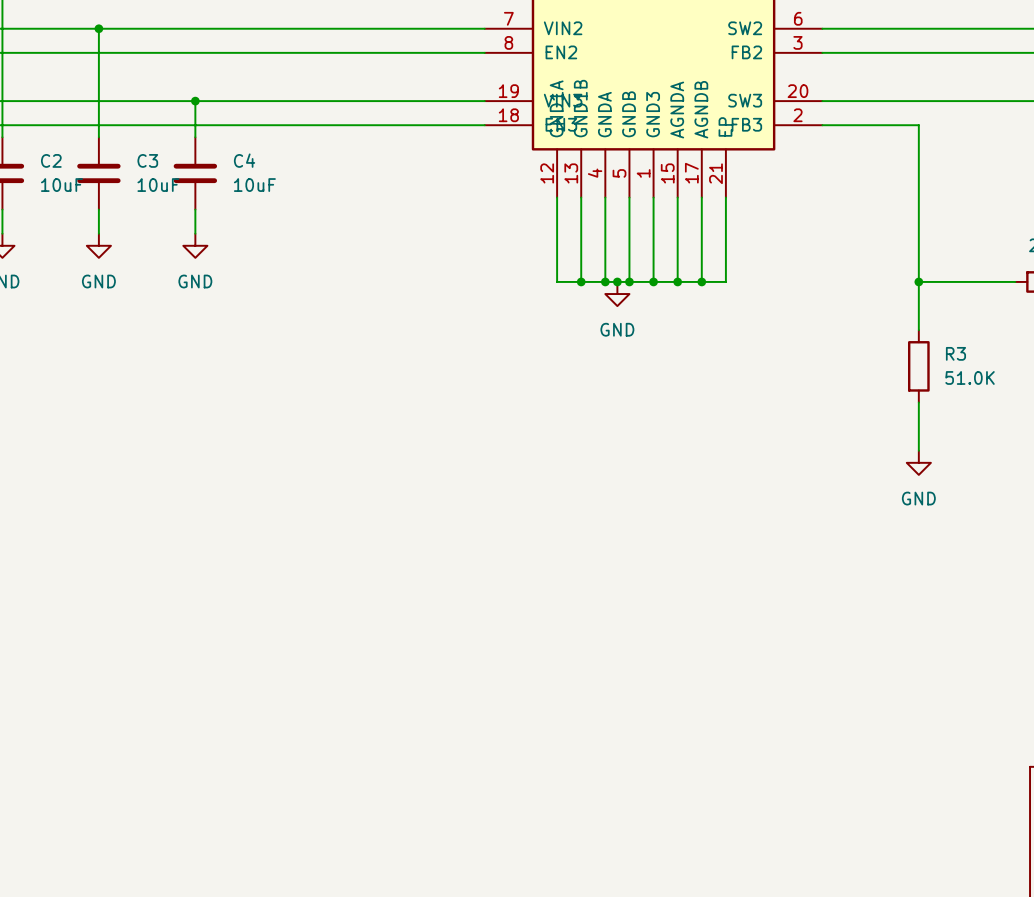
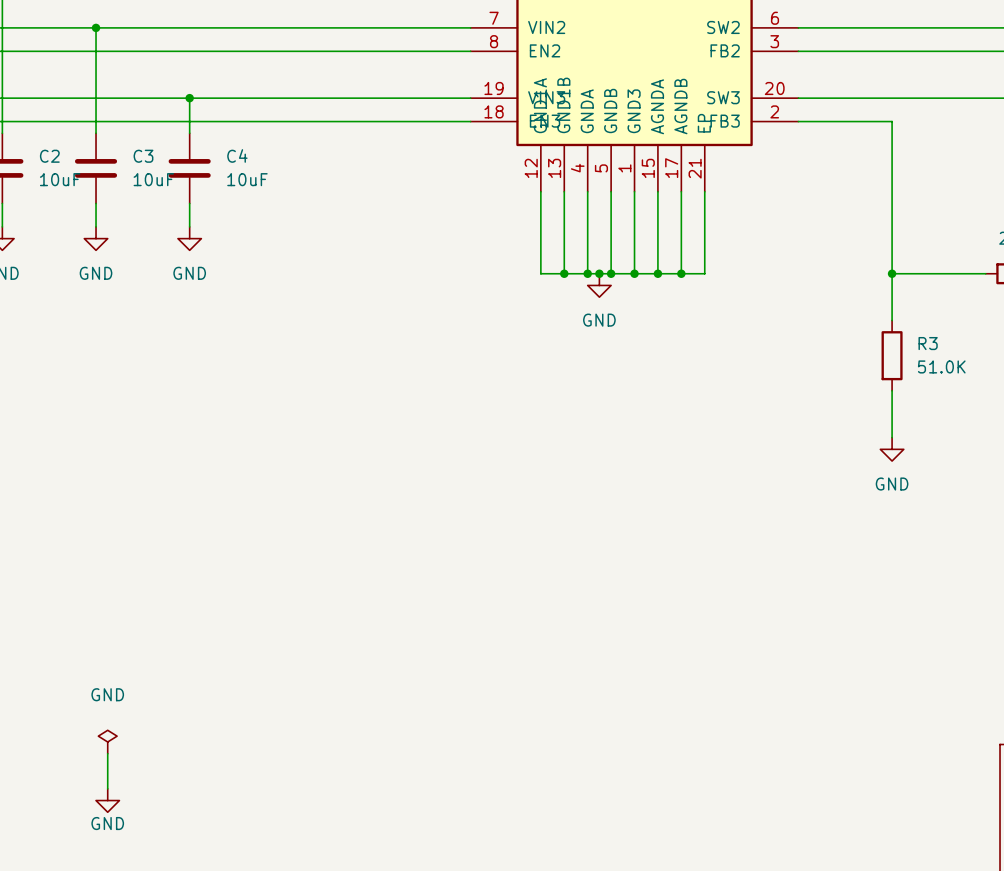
power symbol: none -> GND (107, 742)
wire: none -> (107, 753) (107, 788)
power symbol: none -> GND (107, 800)

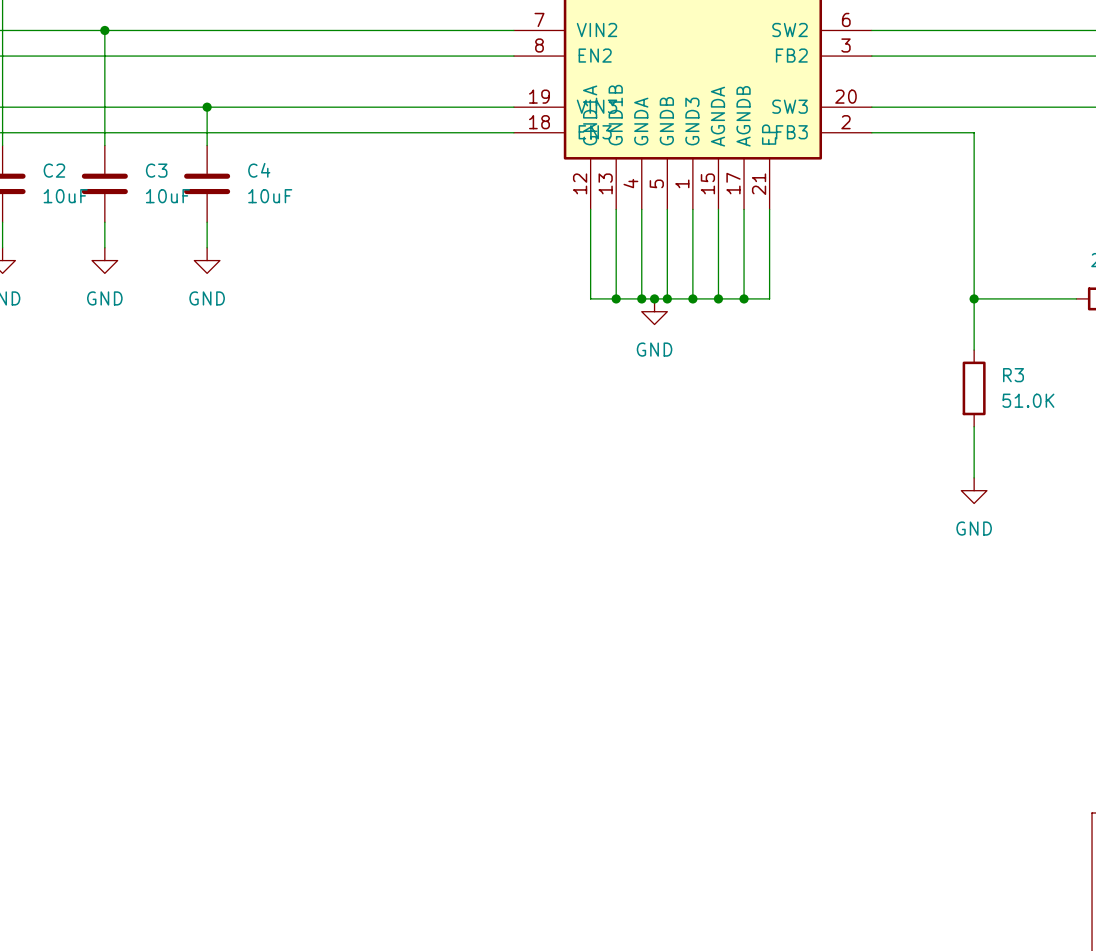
power symbol: GND (107, 742) -> none
wire: (107, 753) (107, 788) -> none
power symbol: GND (107, 800) -> none

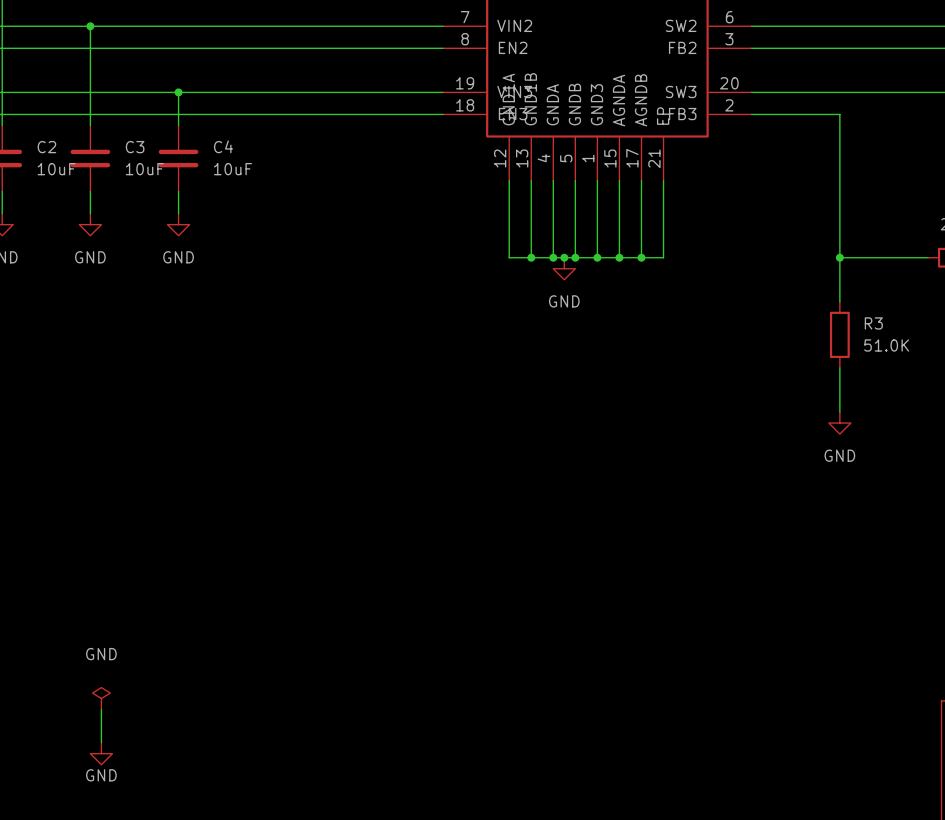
power symbol: none -> GND (101, 698)
wire: none -> (101, 709) (101, 742)
power symbol: none -> GND (101, 753)

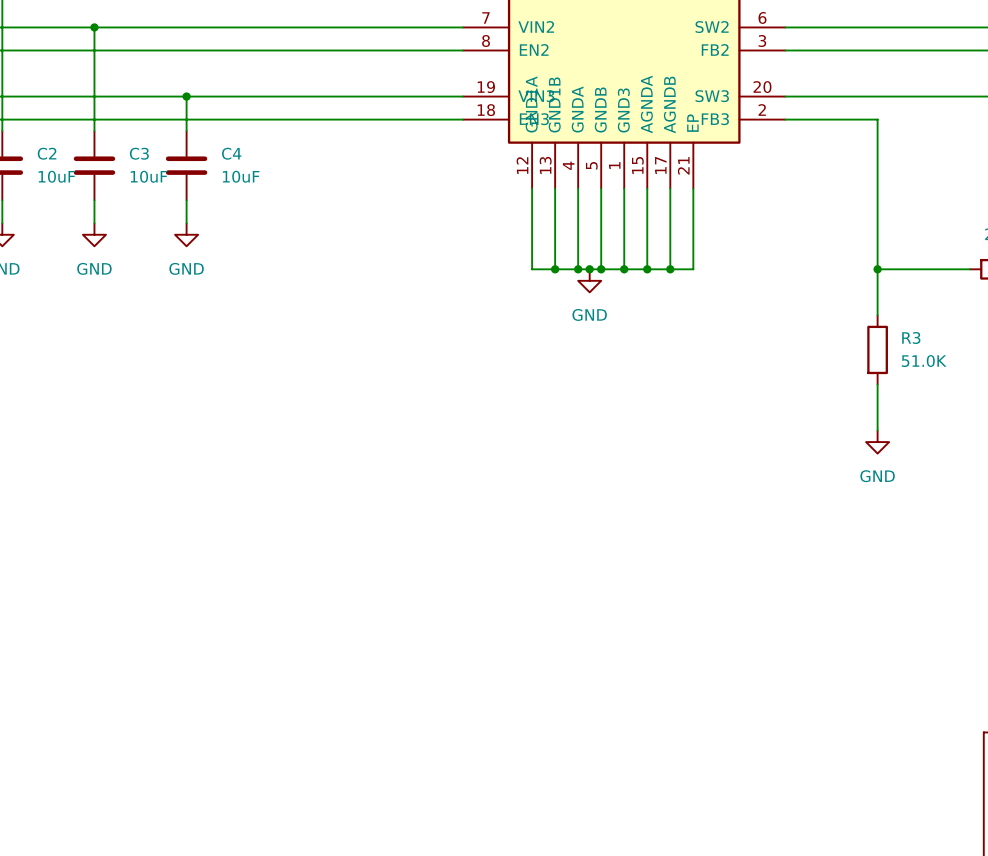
power symbol: GND (101, 698) -> none
wire: (101, 709) (101, 742) -> none
power symbol: GND (101, 753) -> none

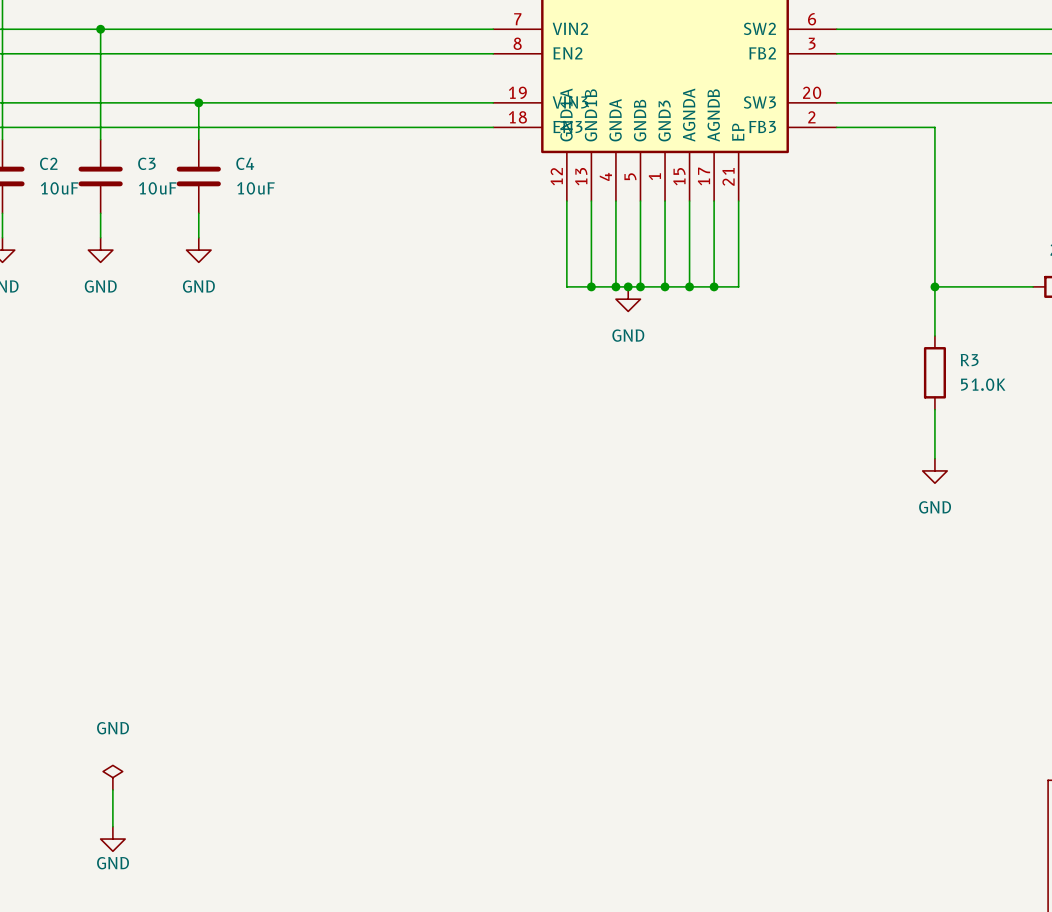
power symbol: none -> GND (112, 777)
wire: none -> (112, 789) (112, 826)
power symbol: none -> GND (112, 839)

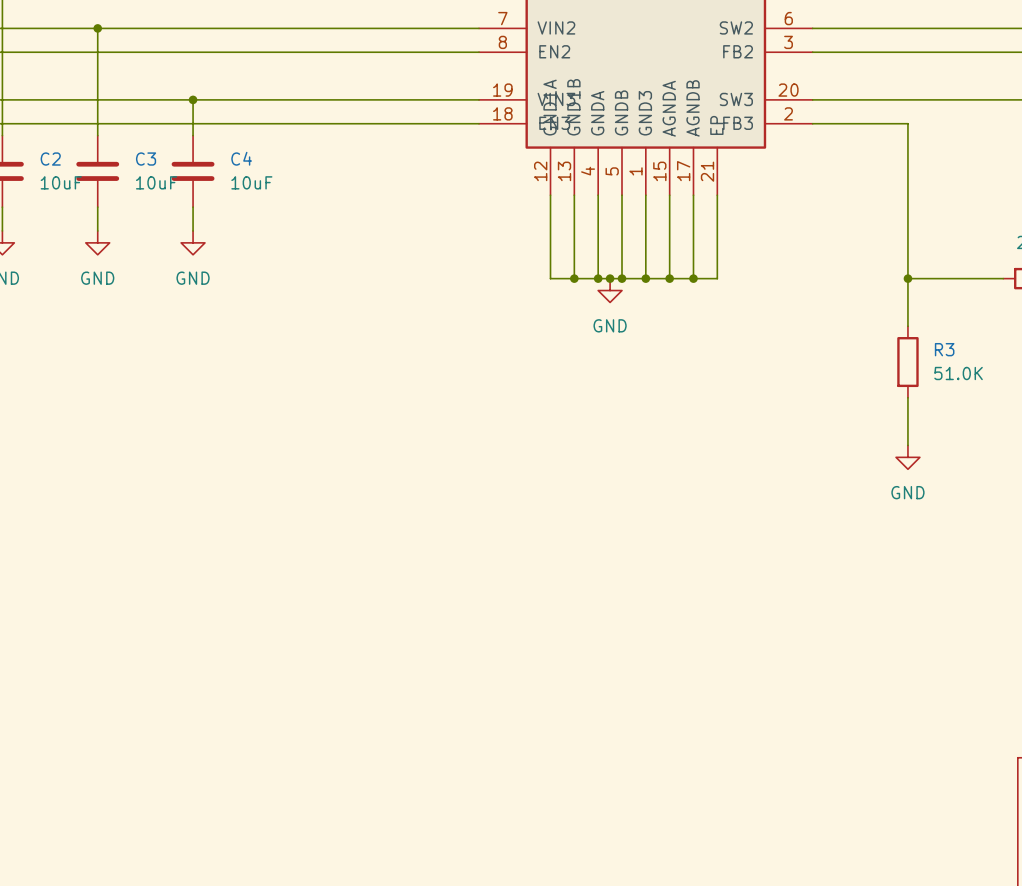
power symbol: GND (112, 777) -> none
wire: (112, 789) (112, 826) -> none
power symbol: GND (112, 839) -> none

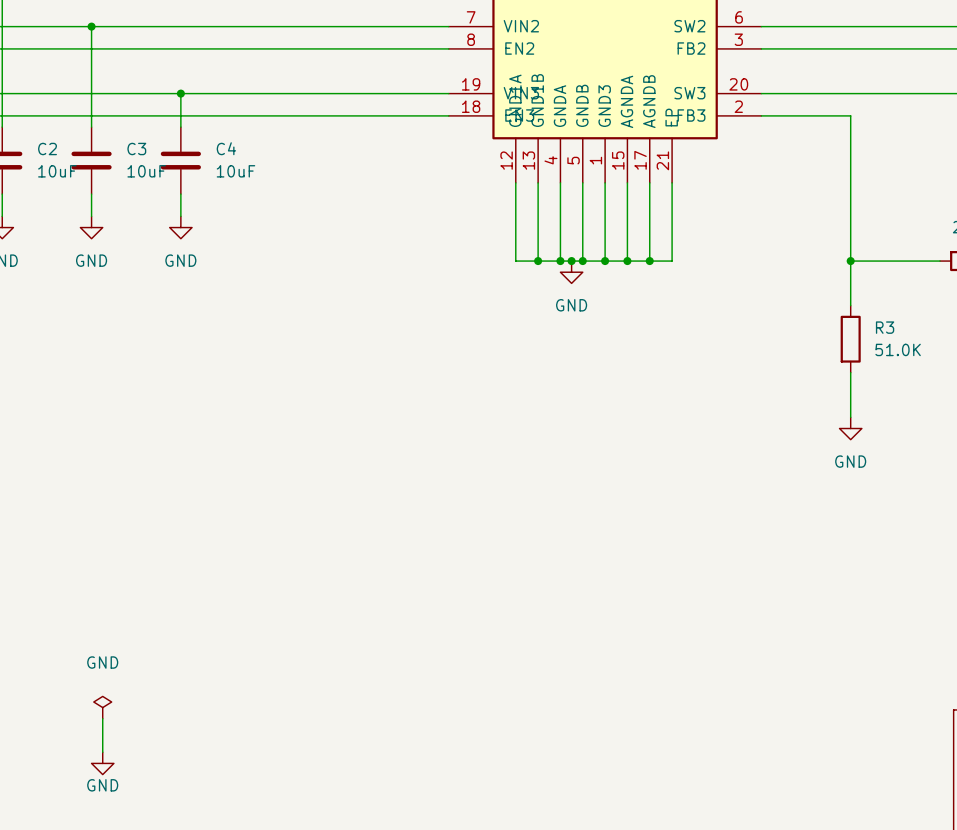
power symbol: none -> GND (102, 707)
wire: none -> (102, 718) (102, 752)
power symbol: none -> GND (102, 763)

